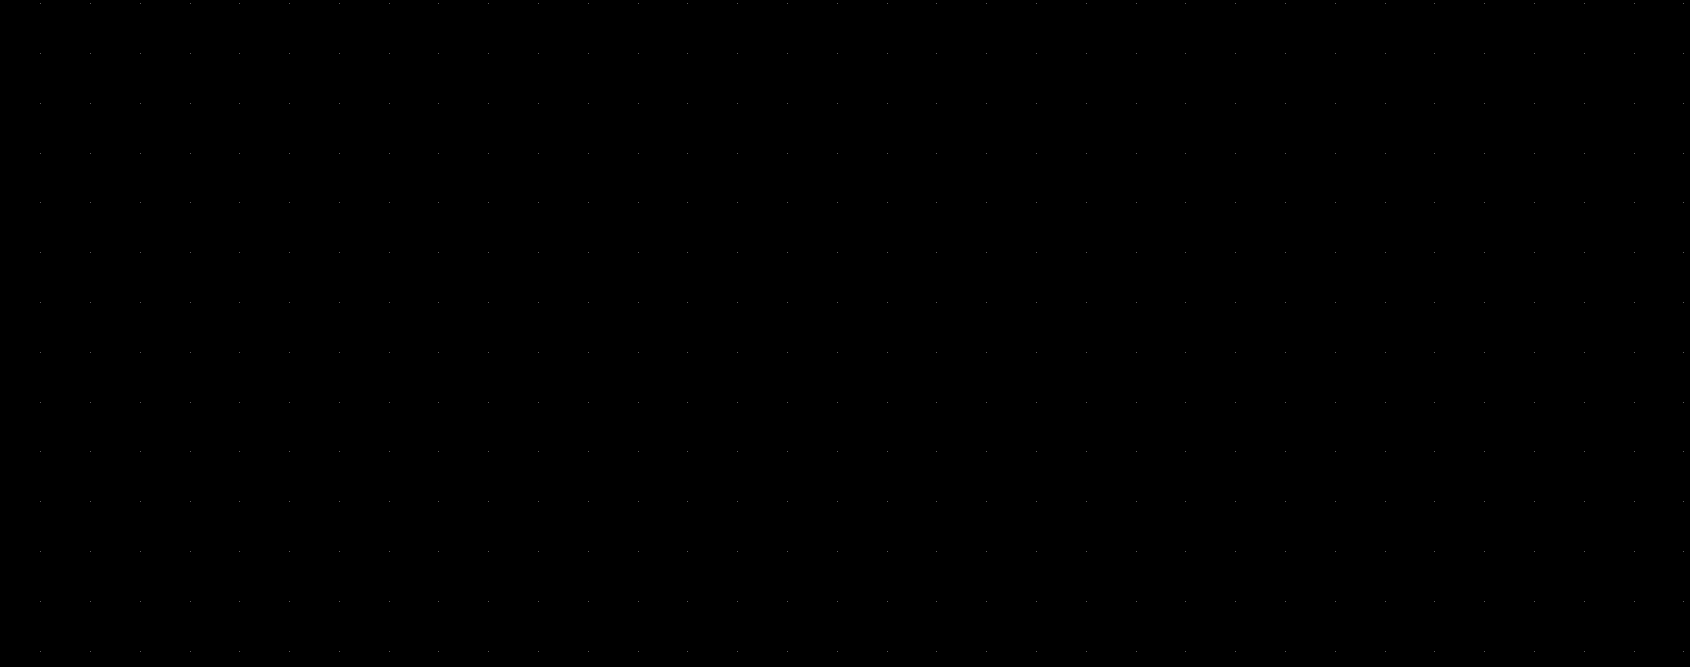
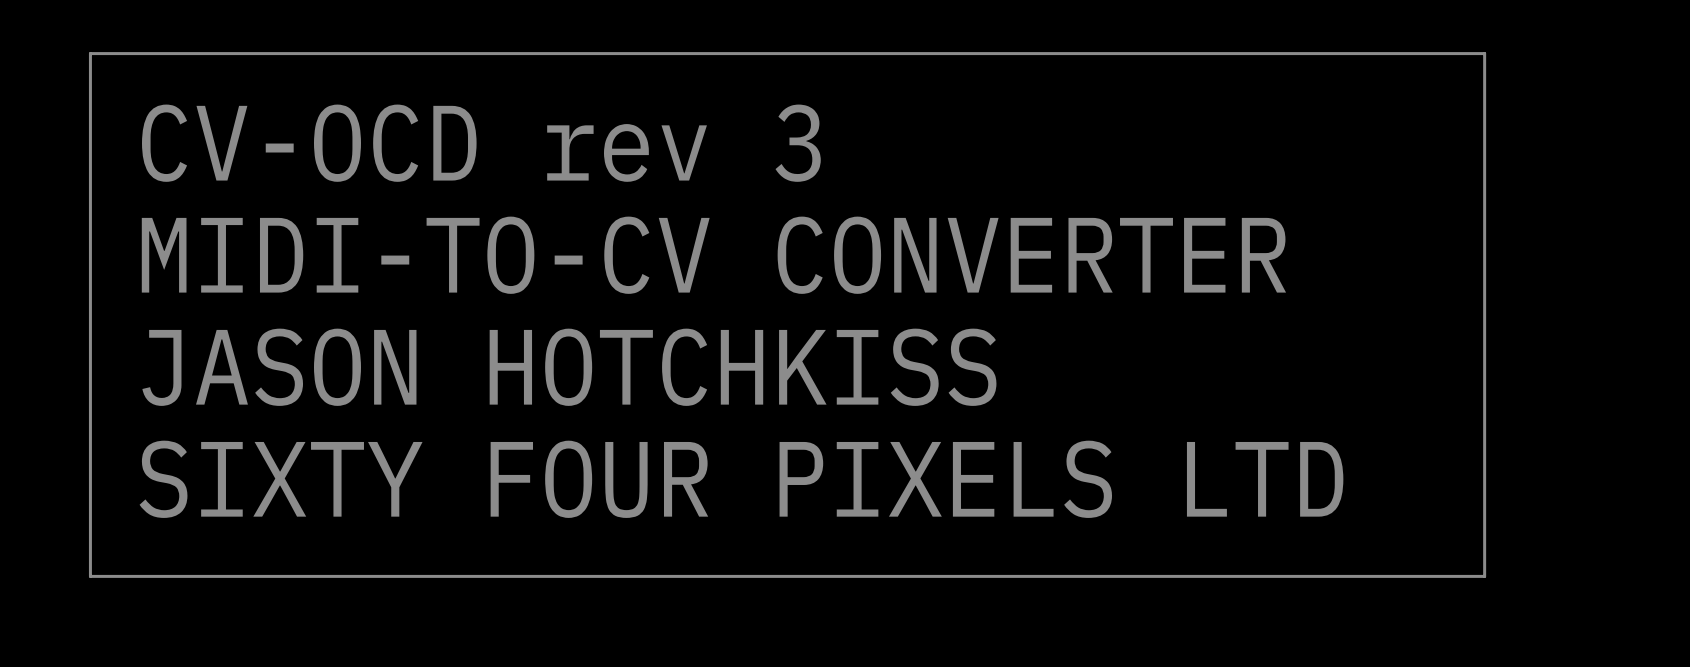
line: none -> (90, 53) (90, 576) (1484, 576) (1484, 53) (90, 53)
text: none -> CV-OCD rev 3 (481, 143)
text: none -> MIDI-TO-CV CONVERTER (713, 255)
text: none -> JASON HOTCHKISS (569, 367)
text: none -> SIXTY FOUR PIXELS LTD (741, 479)

